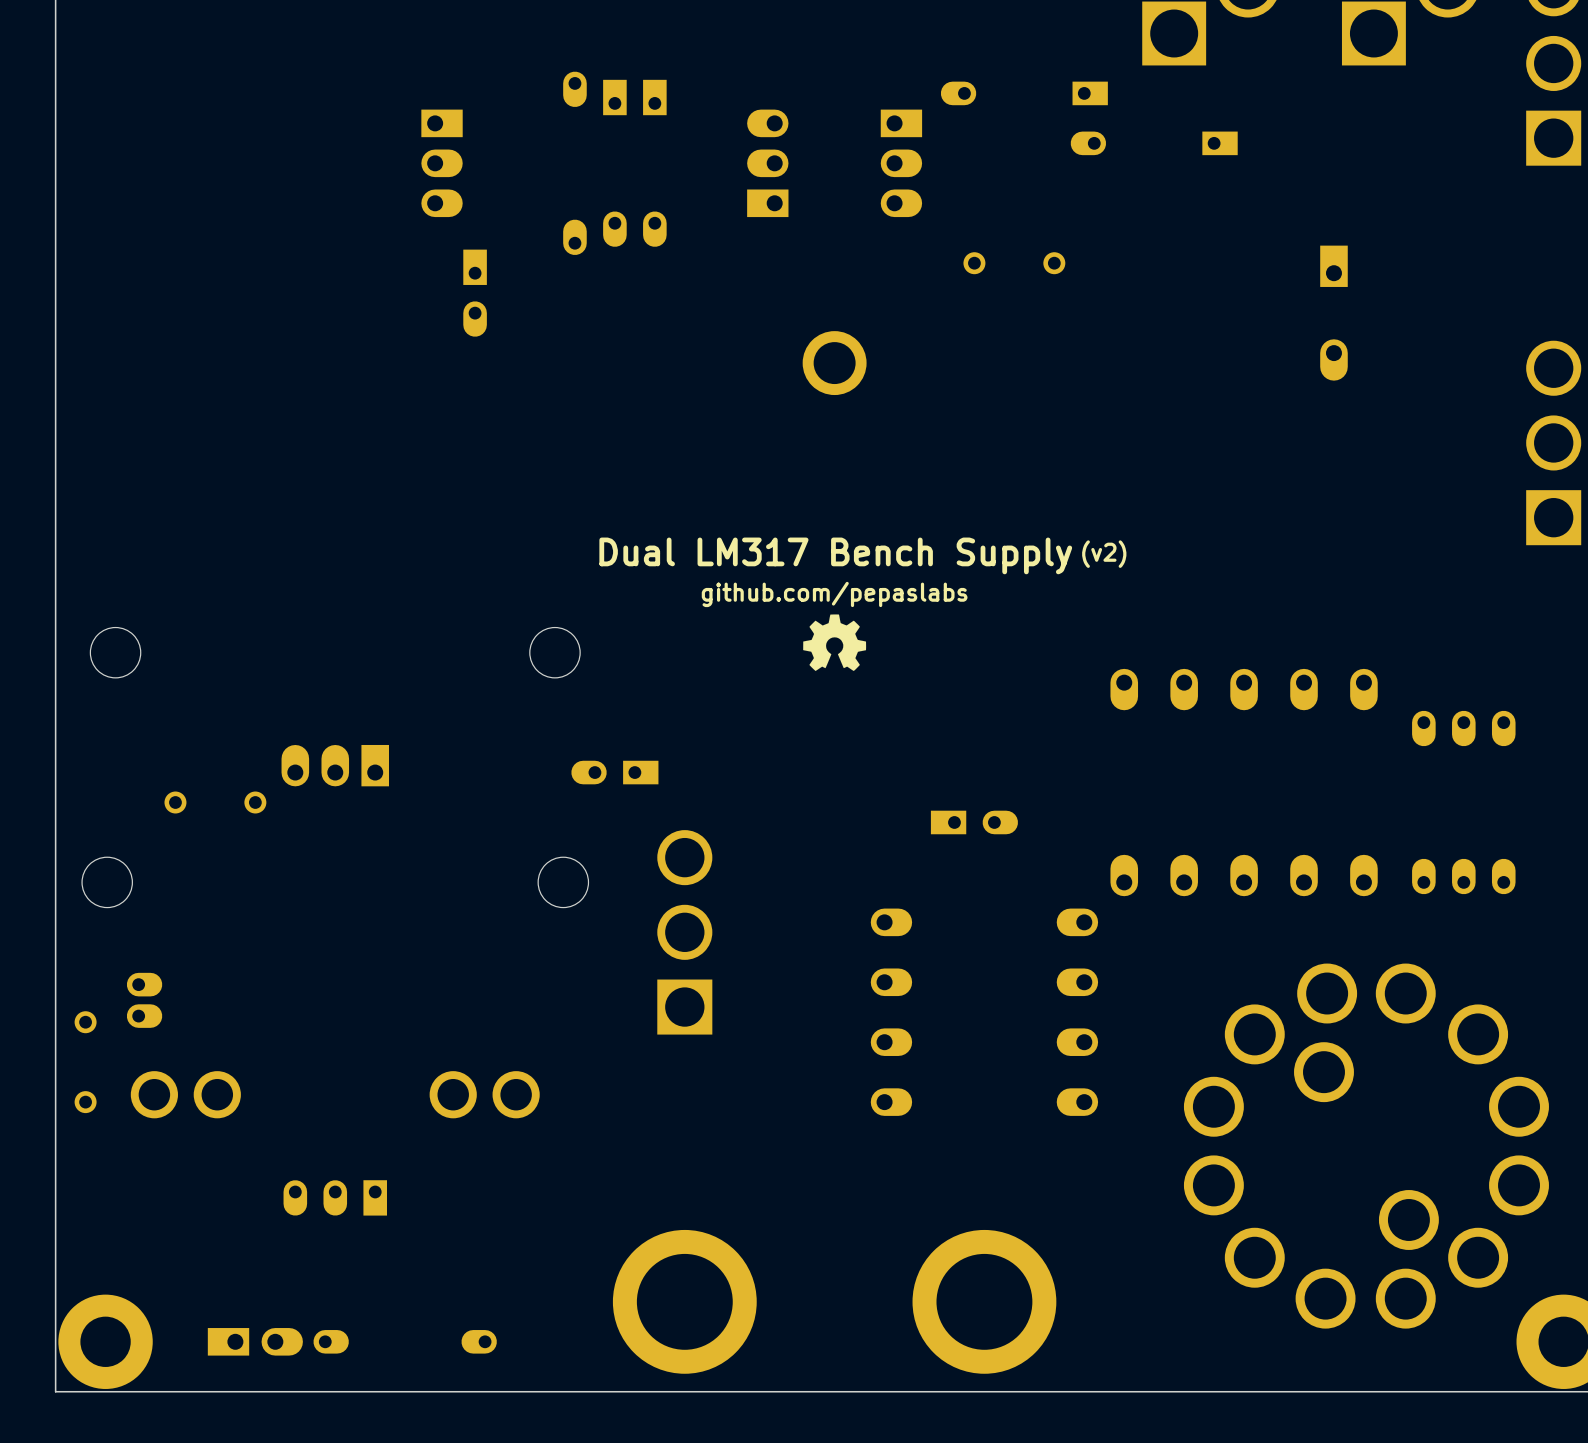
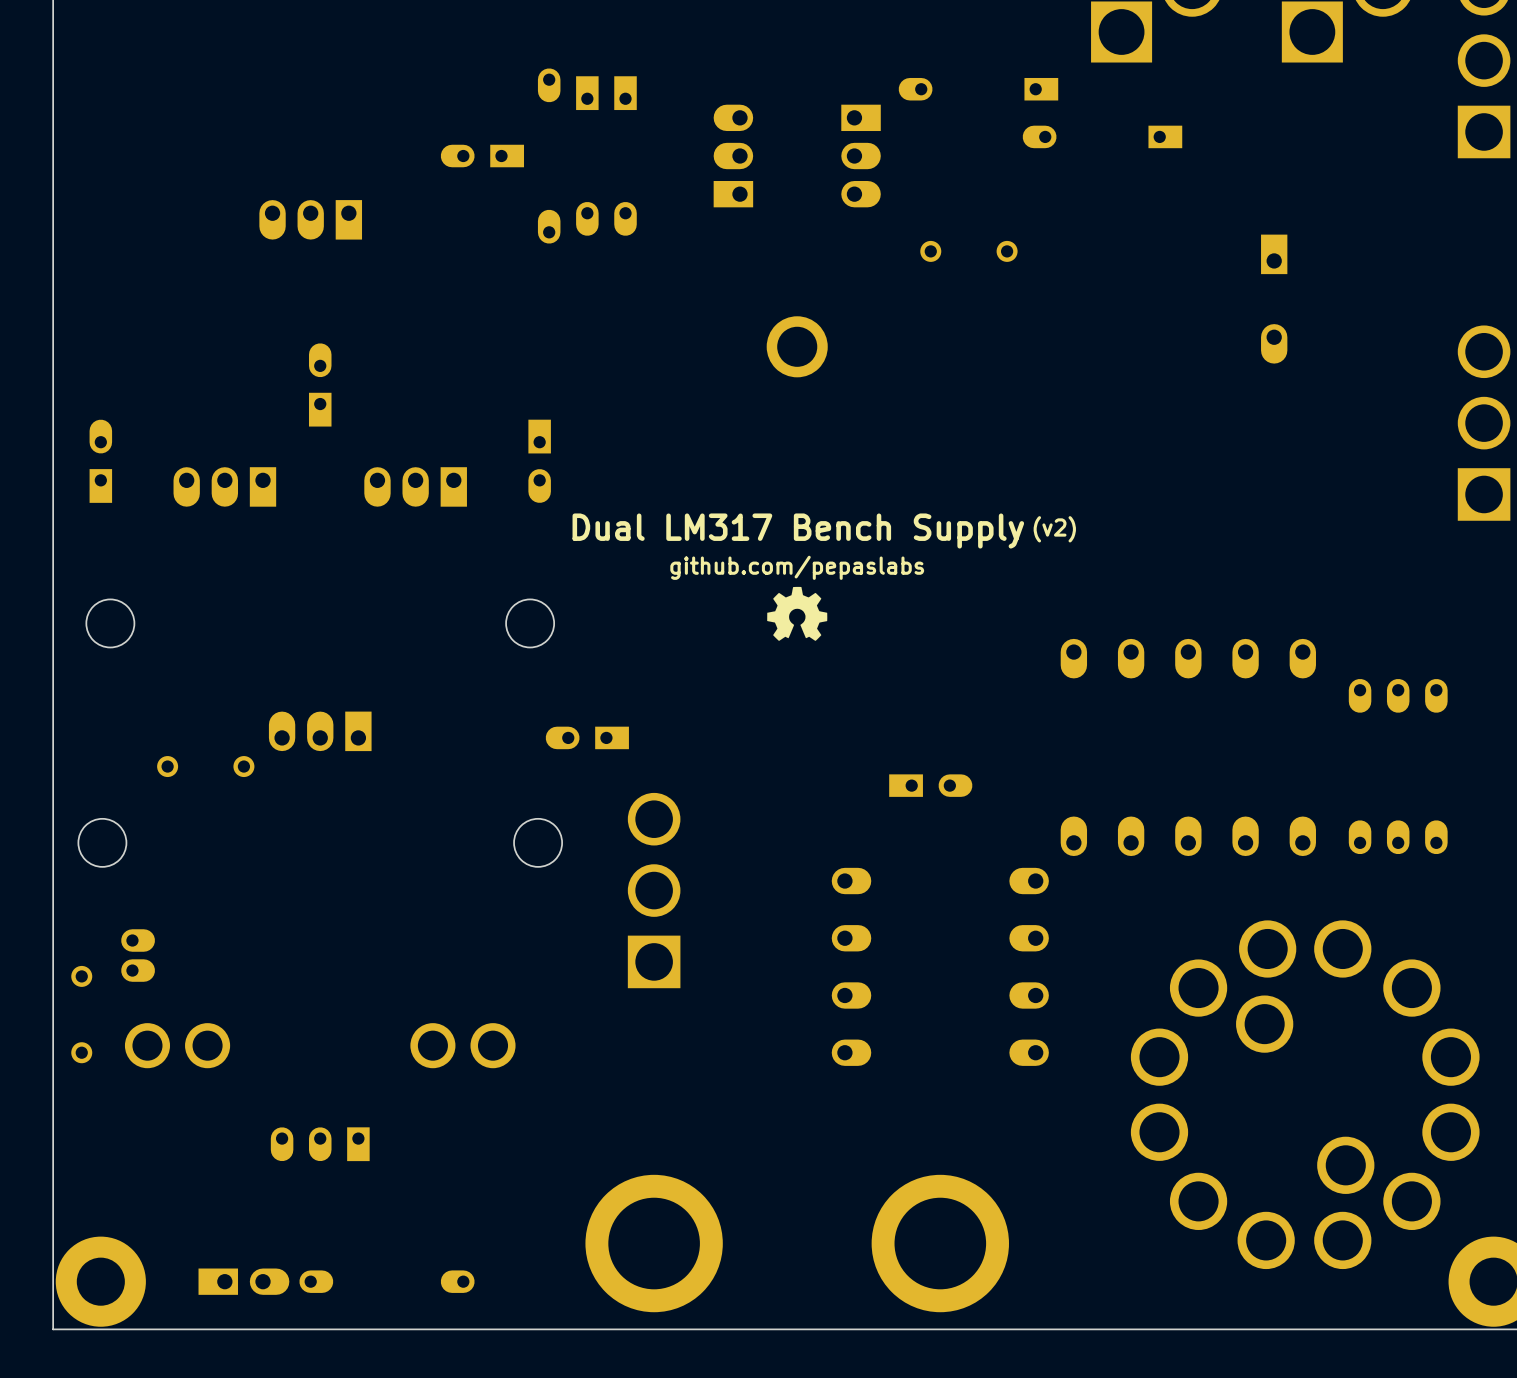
part rotation: 0° (442, 163) -> 90° clockwise (310, 219)
part position: (442, 163) -> (310, 219)
part: none -> (482, 156)
part: (475, 293) -> none
part: none -> (320, 384)
part: none -> (100, 461)
part: none -> (539, 461)
part: none -> (224, 486)
part: none -> (415, 486)

